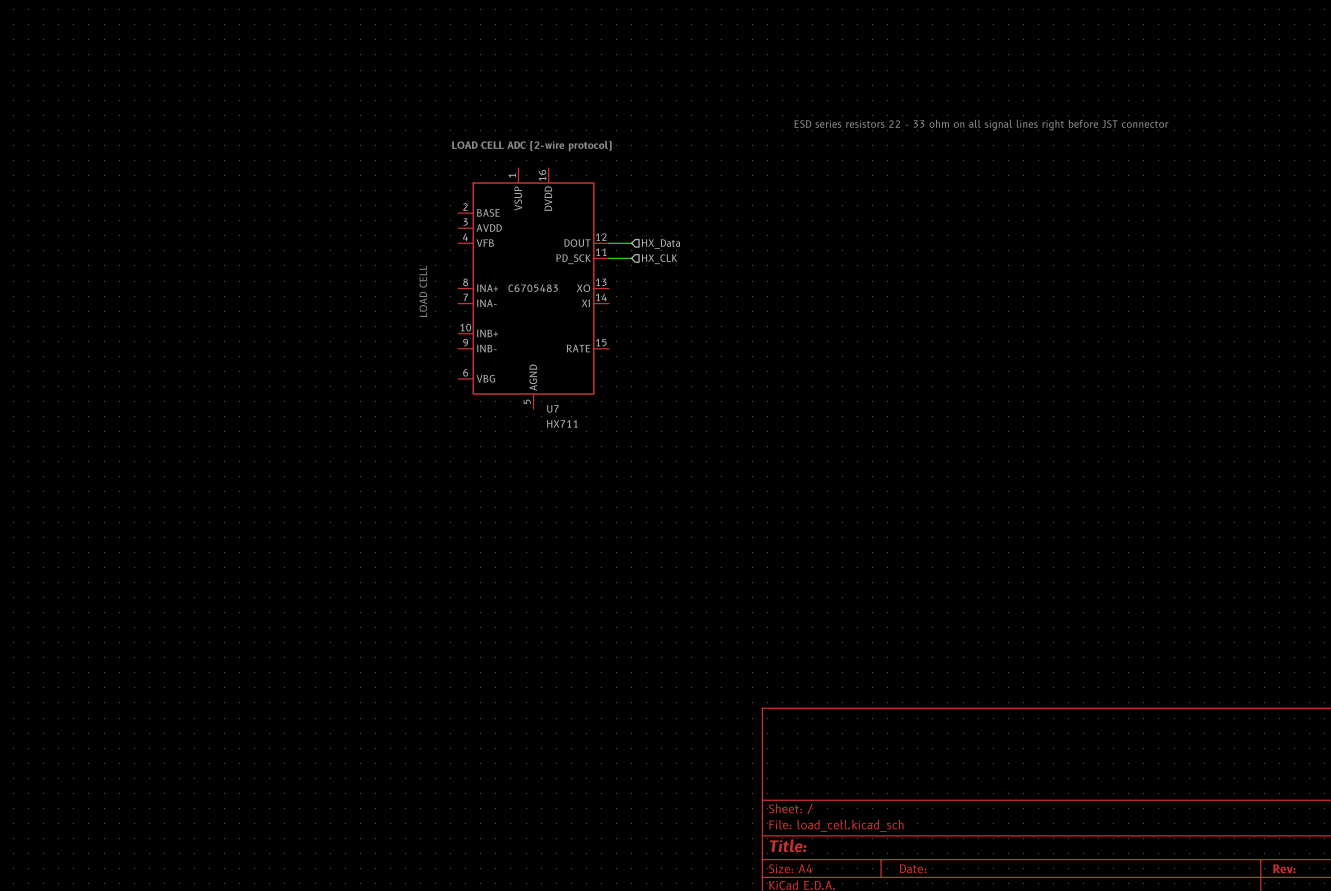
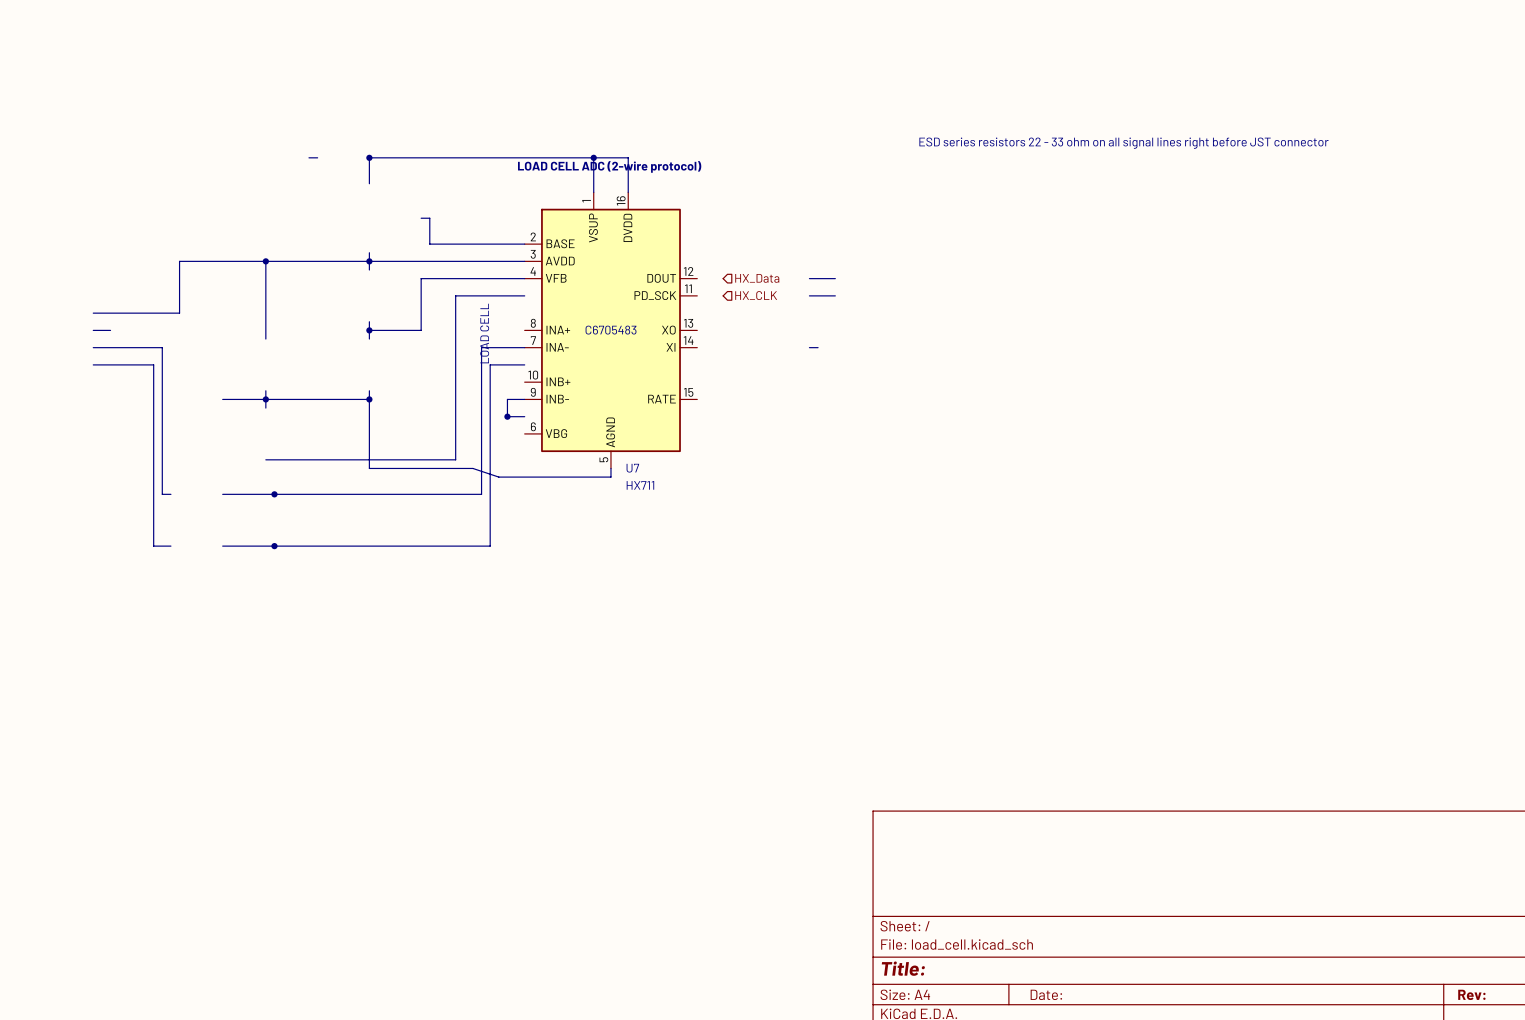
wire: none -> (308, 157) (317, 157)
junction: none -> (369, 157)
wire: none -> (593, 157) (593, 192)
junction: none -> (593, 157)
wire: none -> (369, 183) (369, 157) (628, 157) (628, 192)
wire: none -> (421, 218) (429, 218) (429, 244) (524, 244)
wire: none -> (369, 252) (369, 270)
wire: none -> (265, 261) (265, 339)
junction: none -> (265, 261)
junction: none -> (369, 261)
wire: none -> (524, 261) (179, 261) (179, 313) (93, 313)
wire: none -> (524, 278) (421, 278) (421, 330) (369, 330)
wire: (608, 243) (631, 243) -> (809, 278) (835, 278)
wire: none -> (524, 295) (455, 295) (455, 459) (265, 459)
wire: (608, 258) (631, 258) -> (809, 295) (835, 295)
wire: none -> (369, 321) (369, 339)
wire: none -> (93, 330) (110, 330)
junction: none -> (369, 330)
wire: none -> (93, 347) (162, 347) (162, 494) (170, 494)
wire: none -> (524, 347) (481, 347) (481, 494) (222, 494)
wire: none -> (809, 347) (818, 347)
wire: none -> (93, 364) (153, 364) (153, 546) (170, 546)
wire: none -> (524, 364) (490, 364) (490, 546) (222, 546)
wire: none -> (265, 390) (265, 408)
wire: none -> (369, 390) (369, 468) (472, 468) (498, 477) (610, 477) (610, 468)
wire: none -> (222, 399) (369, 399)
junction: none -> (265, 399)
junction: none -> (369, 399)
wire: none -> (524, 399) (507, 399) (507, 416) (524, 416)
junction: none -> (507, 416)
junction: none -> (274, 494)
junction: none -> (274, 546)

